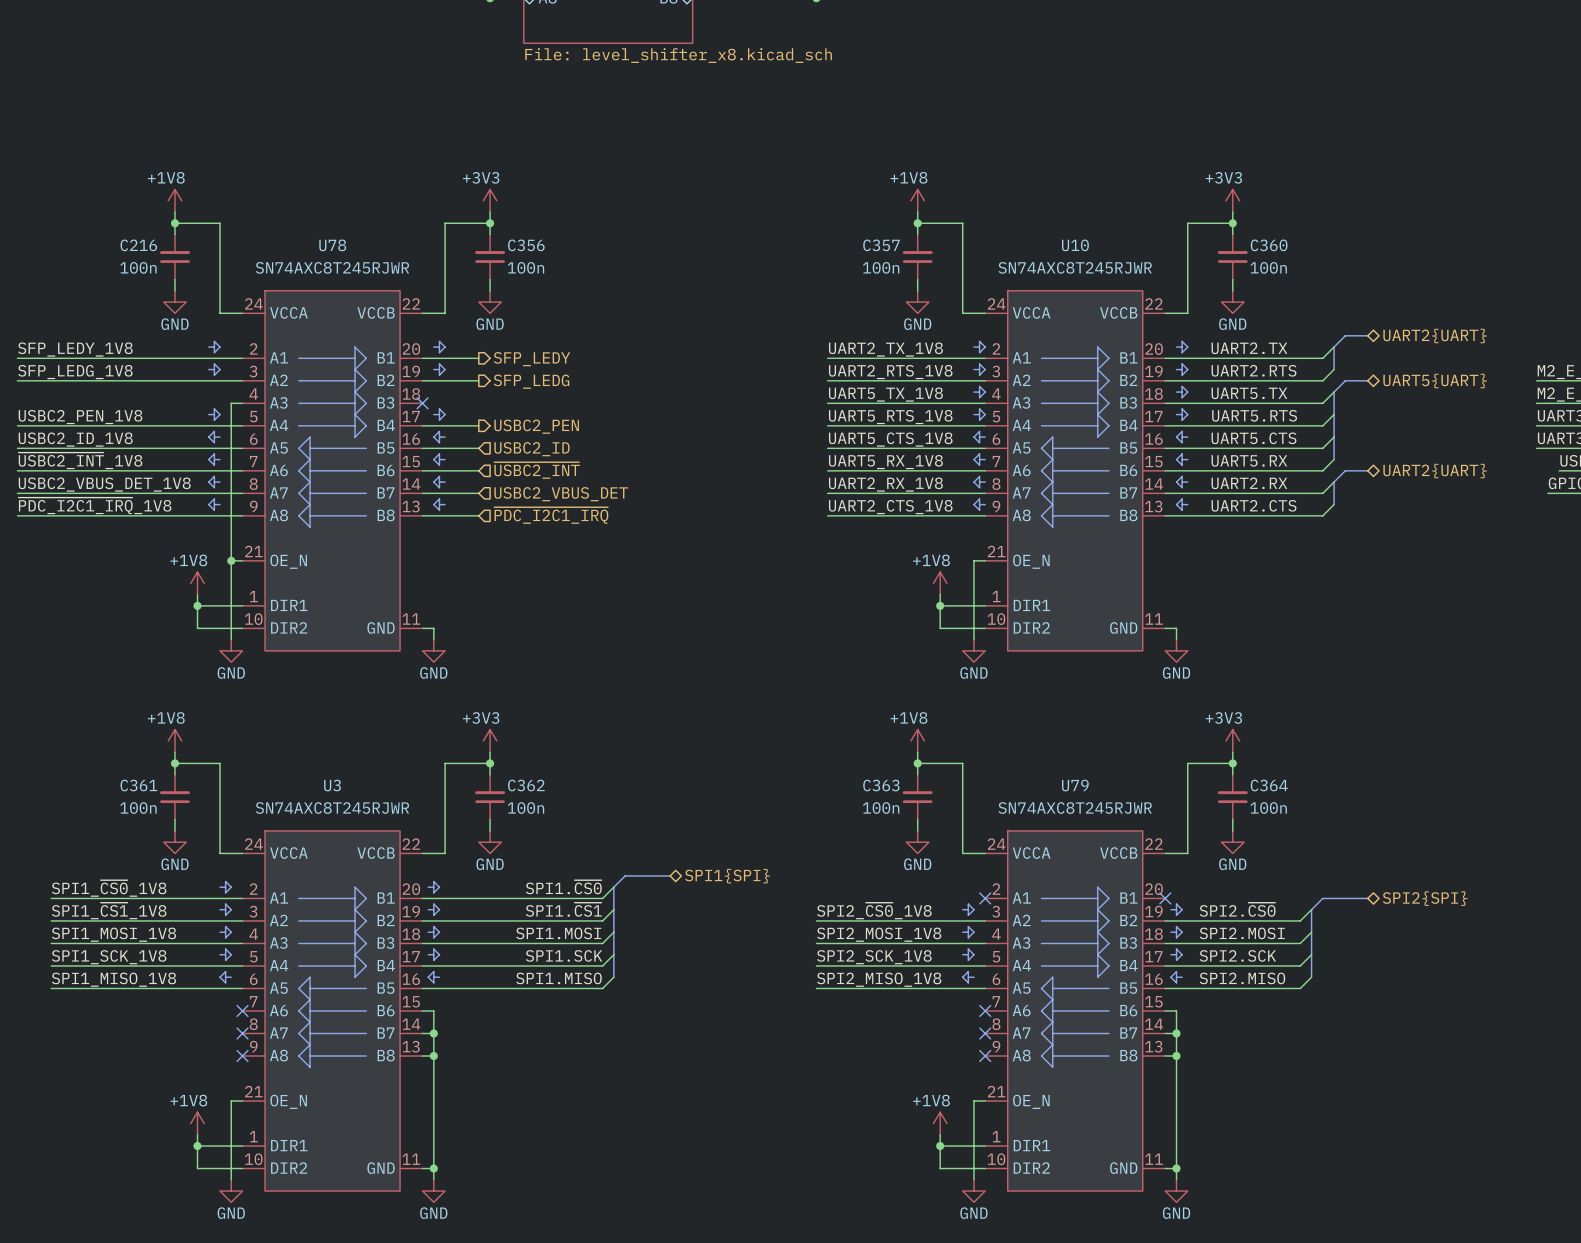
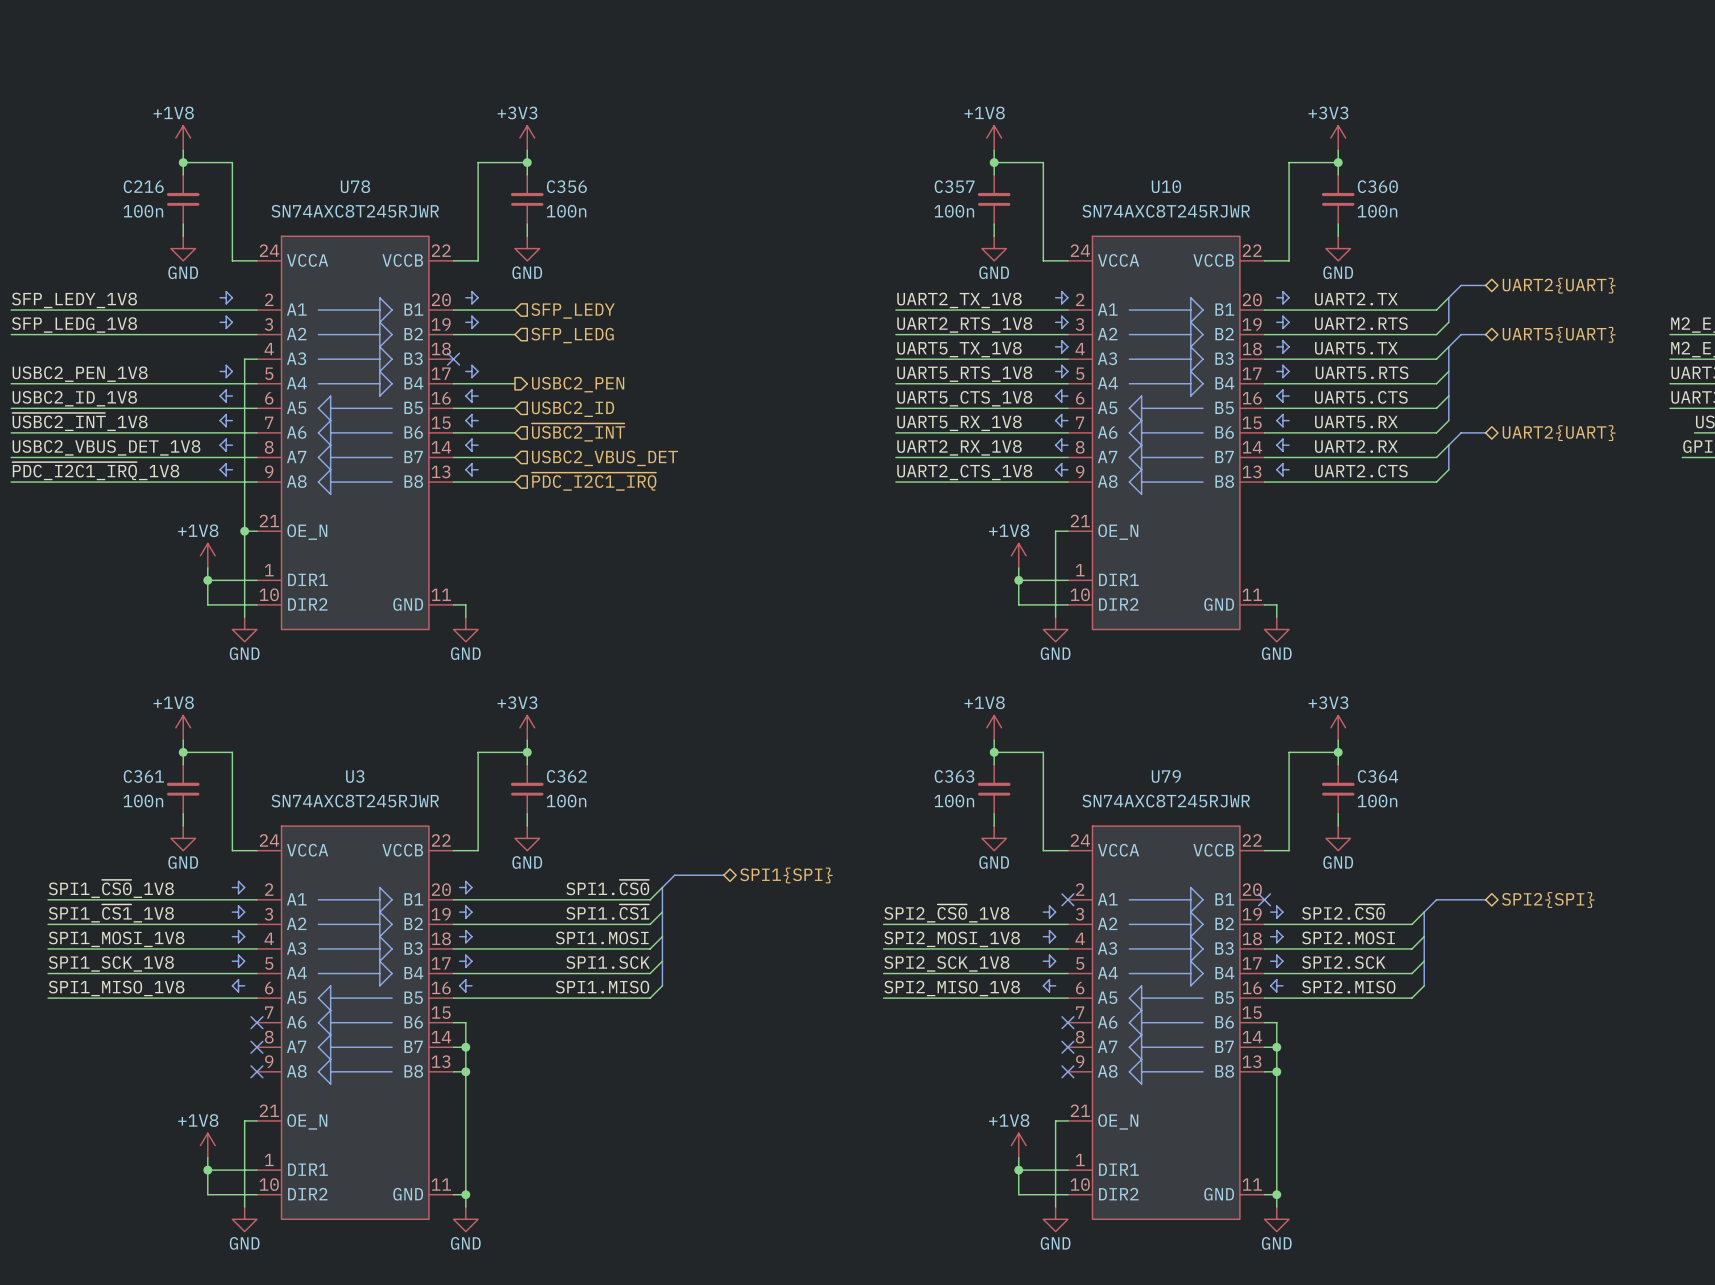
hierarchical label shape: output (532, 359) -> input (573, 310)
hierarchical label shape: output (531, 381) -> input (572, 335)

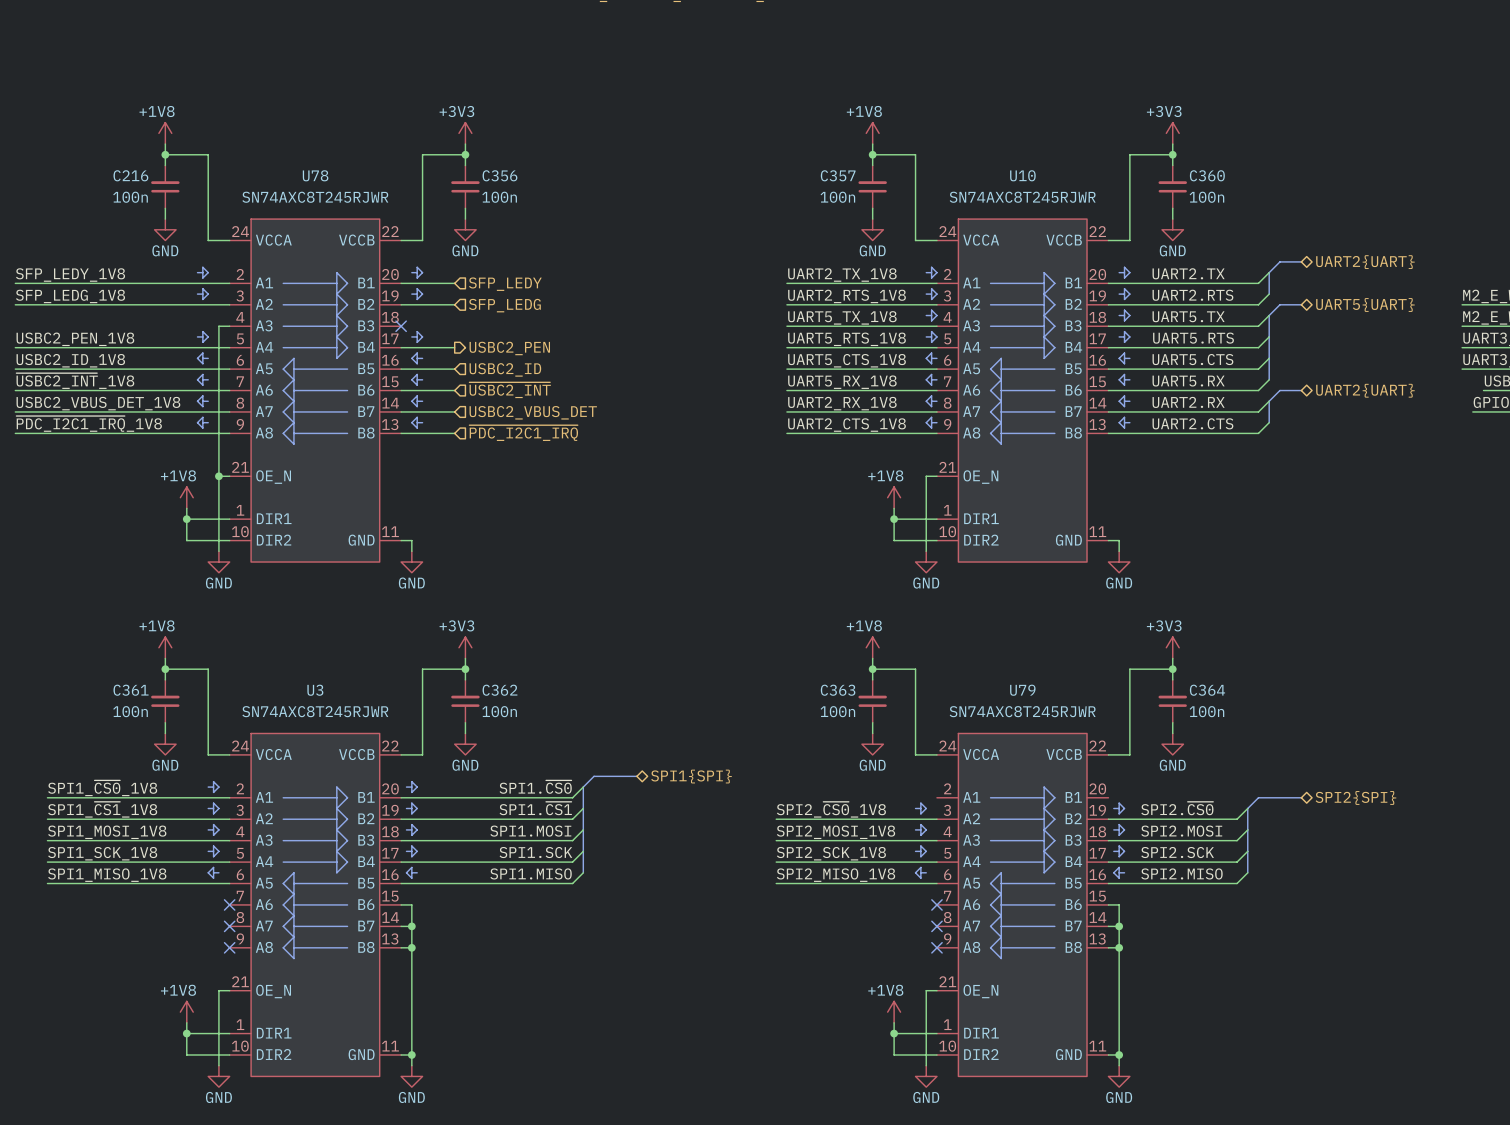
no-connect mark: (1067, 899) -> none
no-connect mark: (1264, 899) -> none

